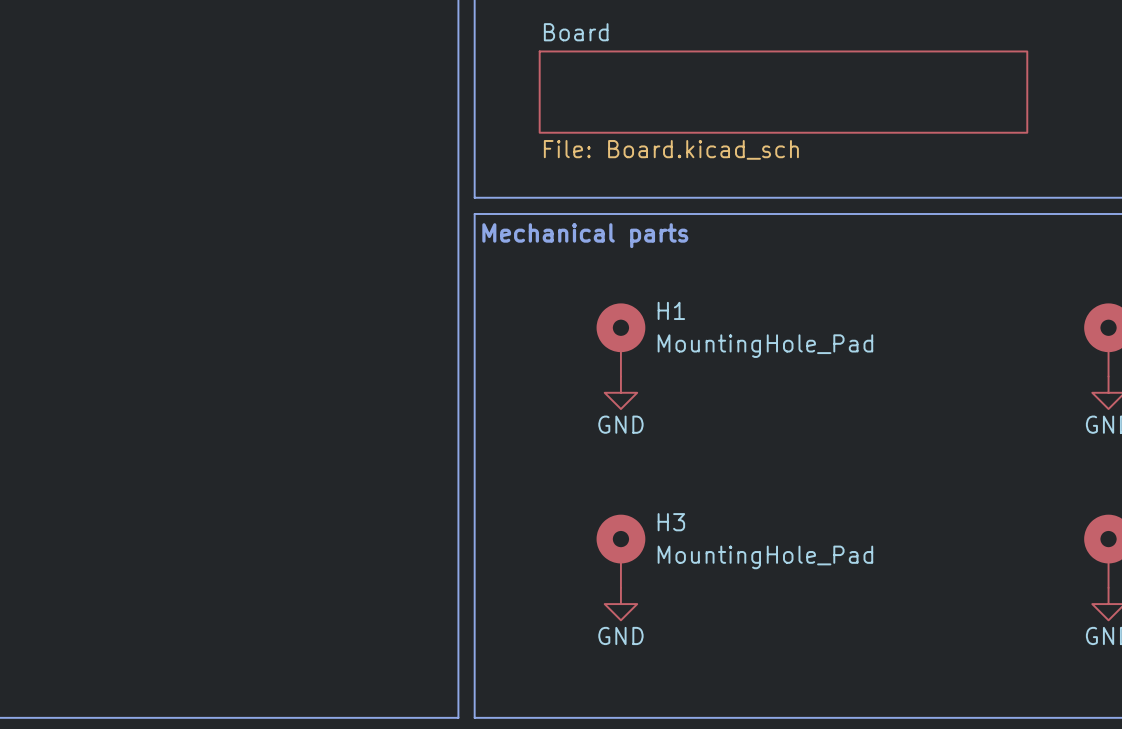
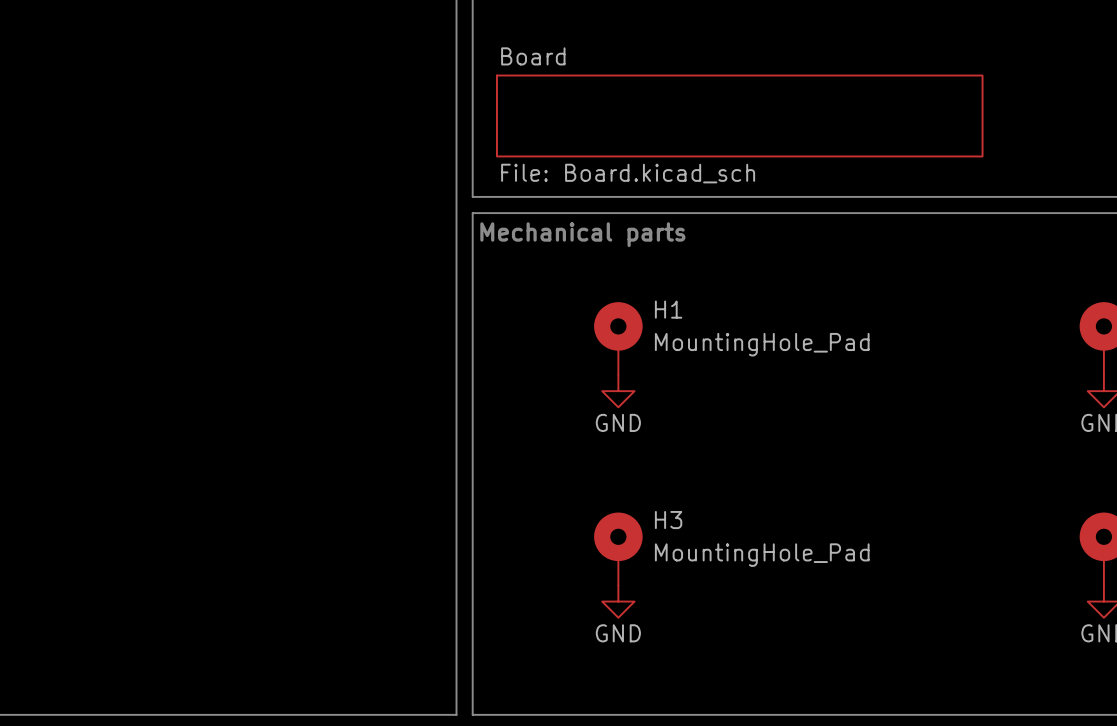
sheet Board position: (783, 92) -> (739, 115)

